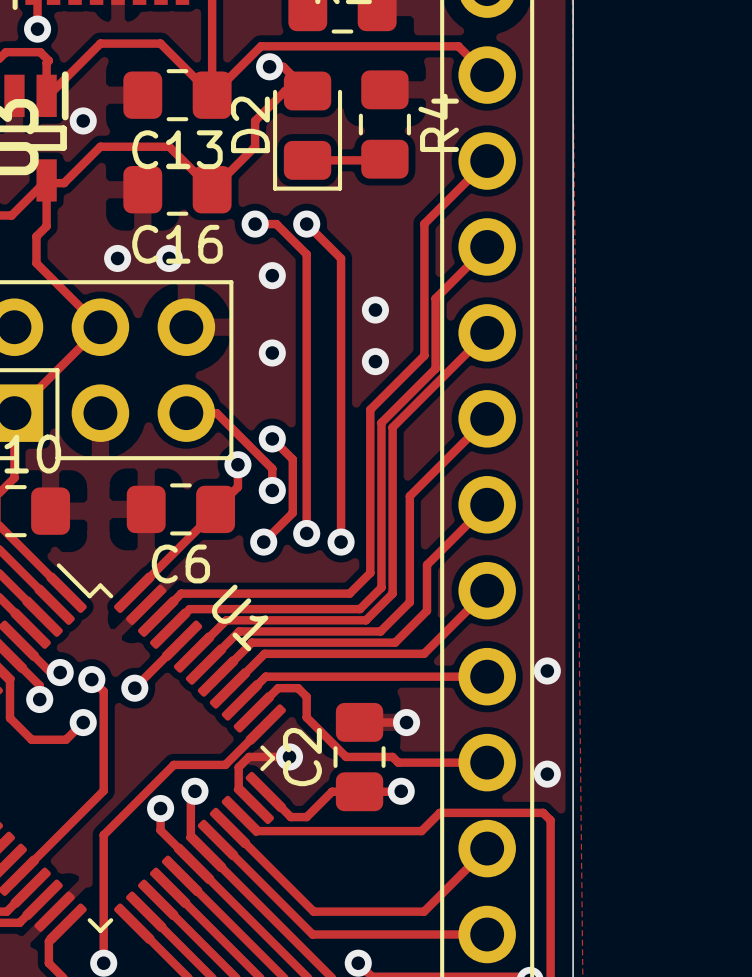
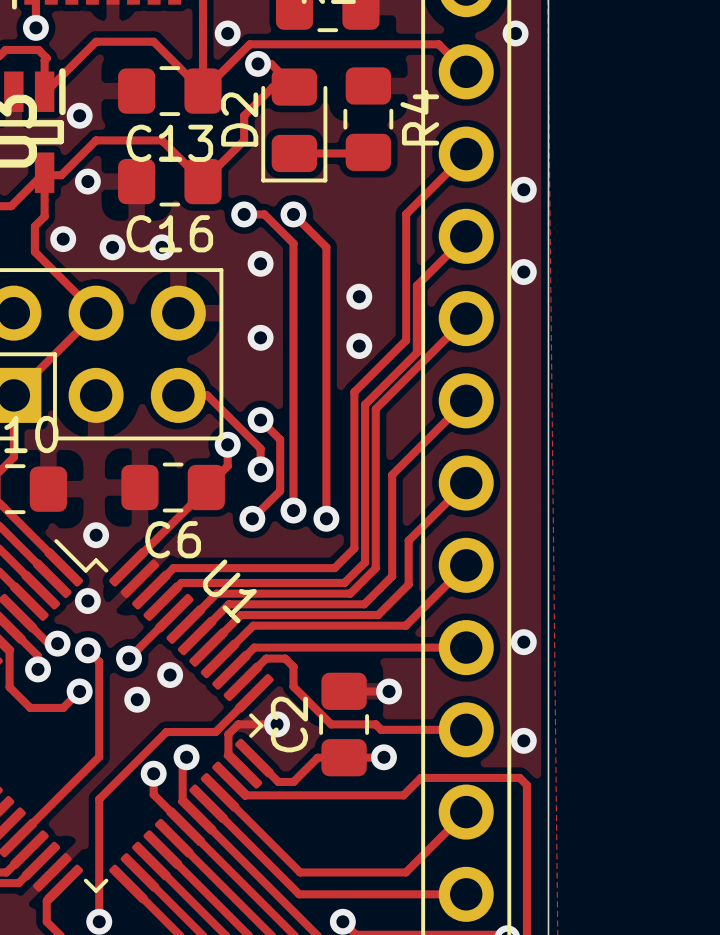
via: none -> (227, 33)
via: none -> (515, 33)
via: none -> (87, 181)
via: none -> (523, 189)
via: none -> (63, 239)
via: none -> (523, 272)
via: none -> (96, 535)
via: none -> (87, 601)
via: none -> (170, 675)
via: none -> (137, 699)

